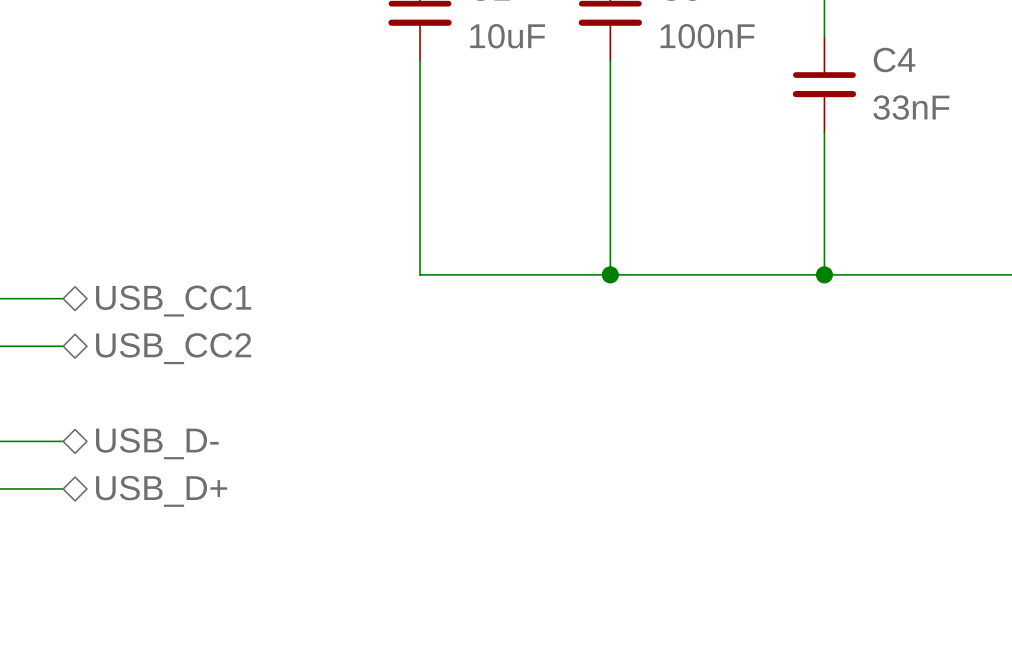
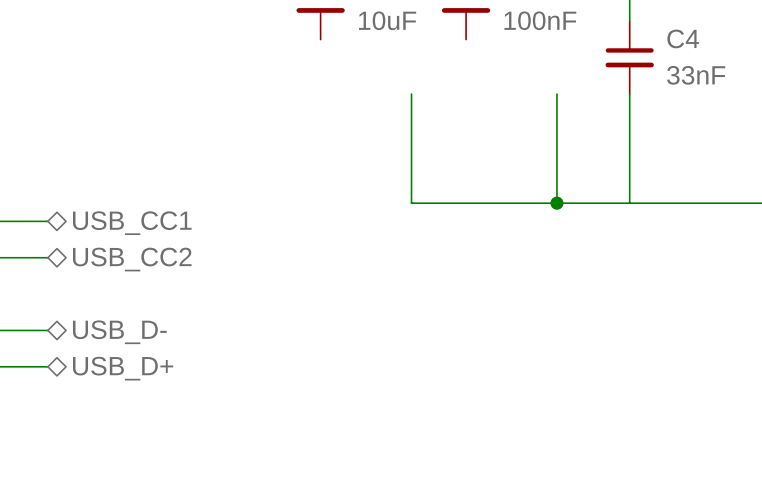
wire: (420, 60) (420, 274) (538, 274) -> (411, 94) (411, 203)
wire: (610, 60) (610, 274) -> none
wire: none -> (556, 94) (556, 203)
junction: (610, 274) -> none
junction: none -> (556, 203)
junction: (824, 274) -> none

